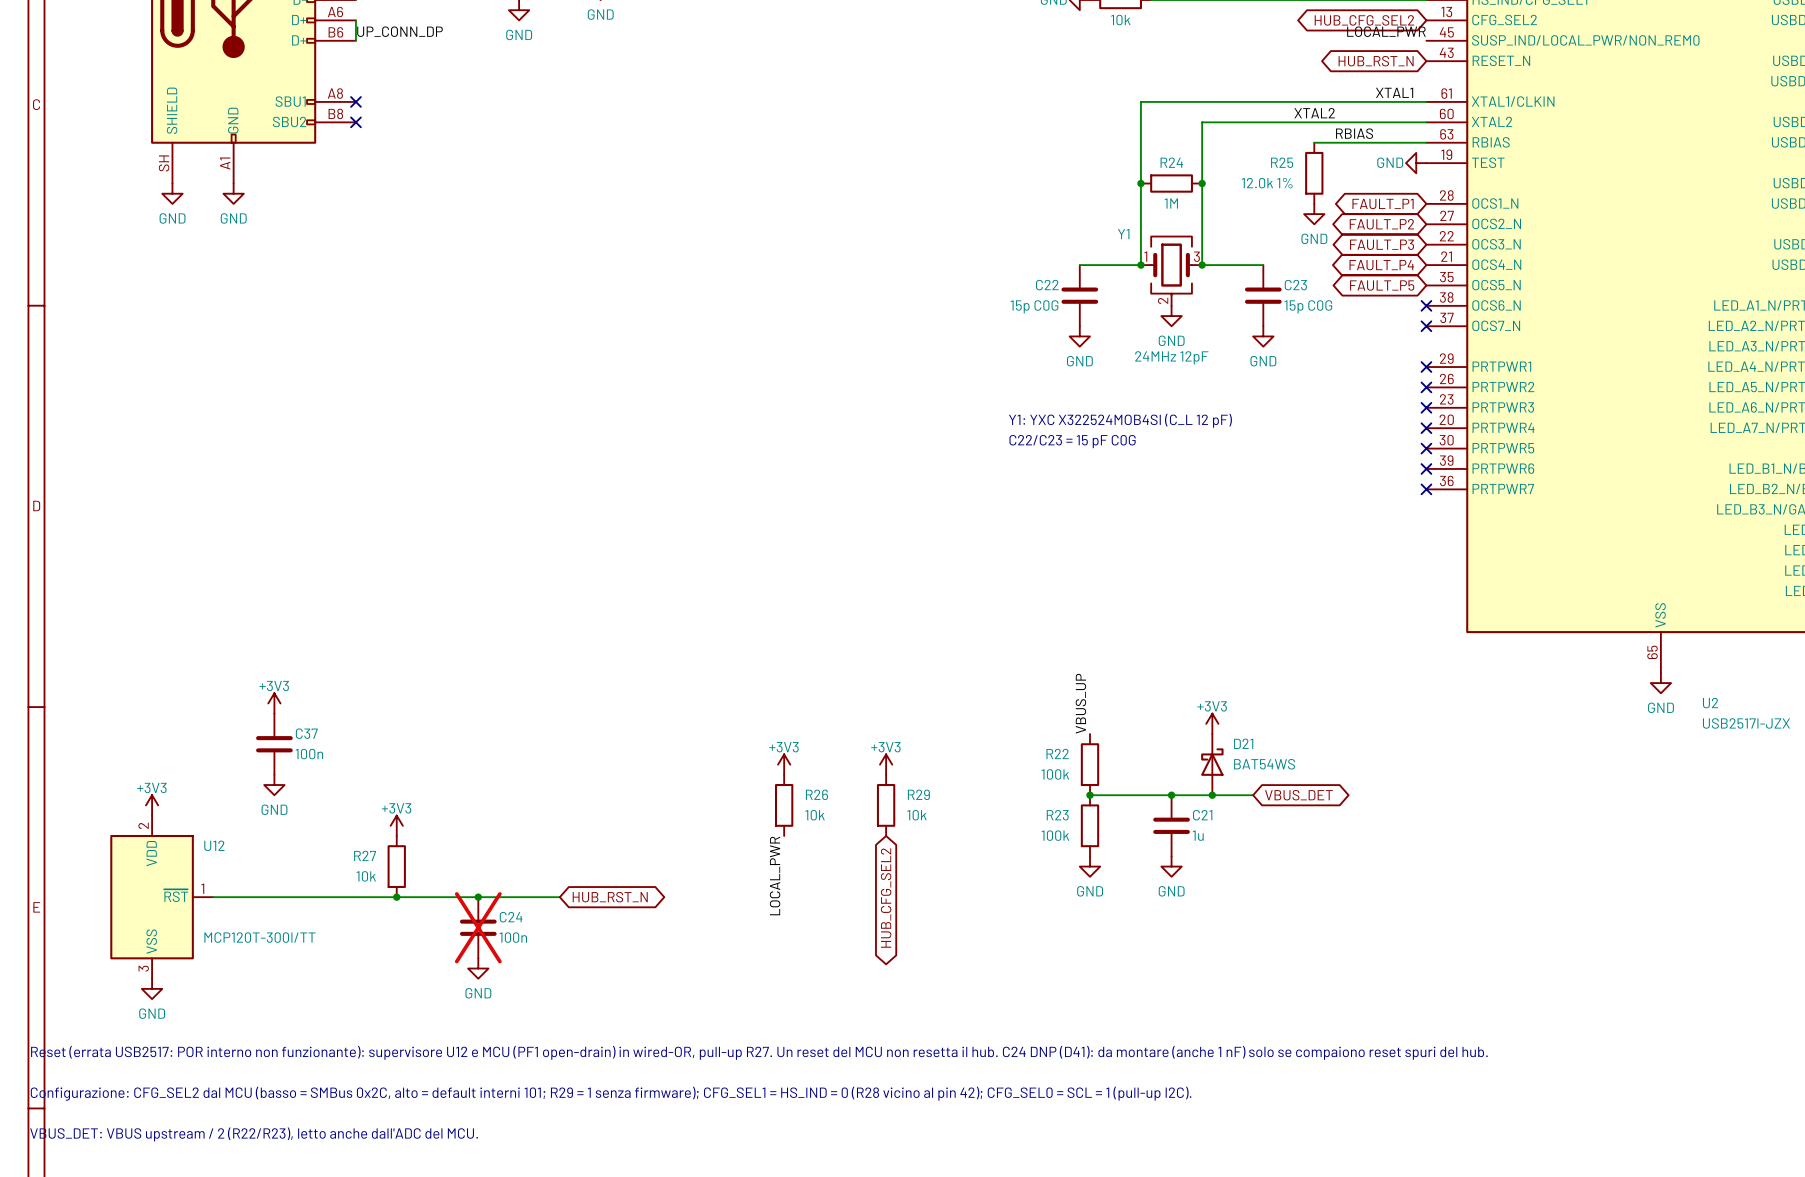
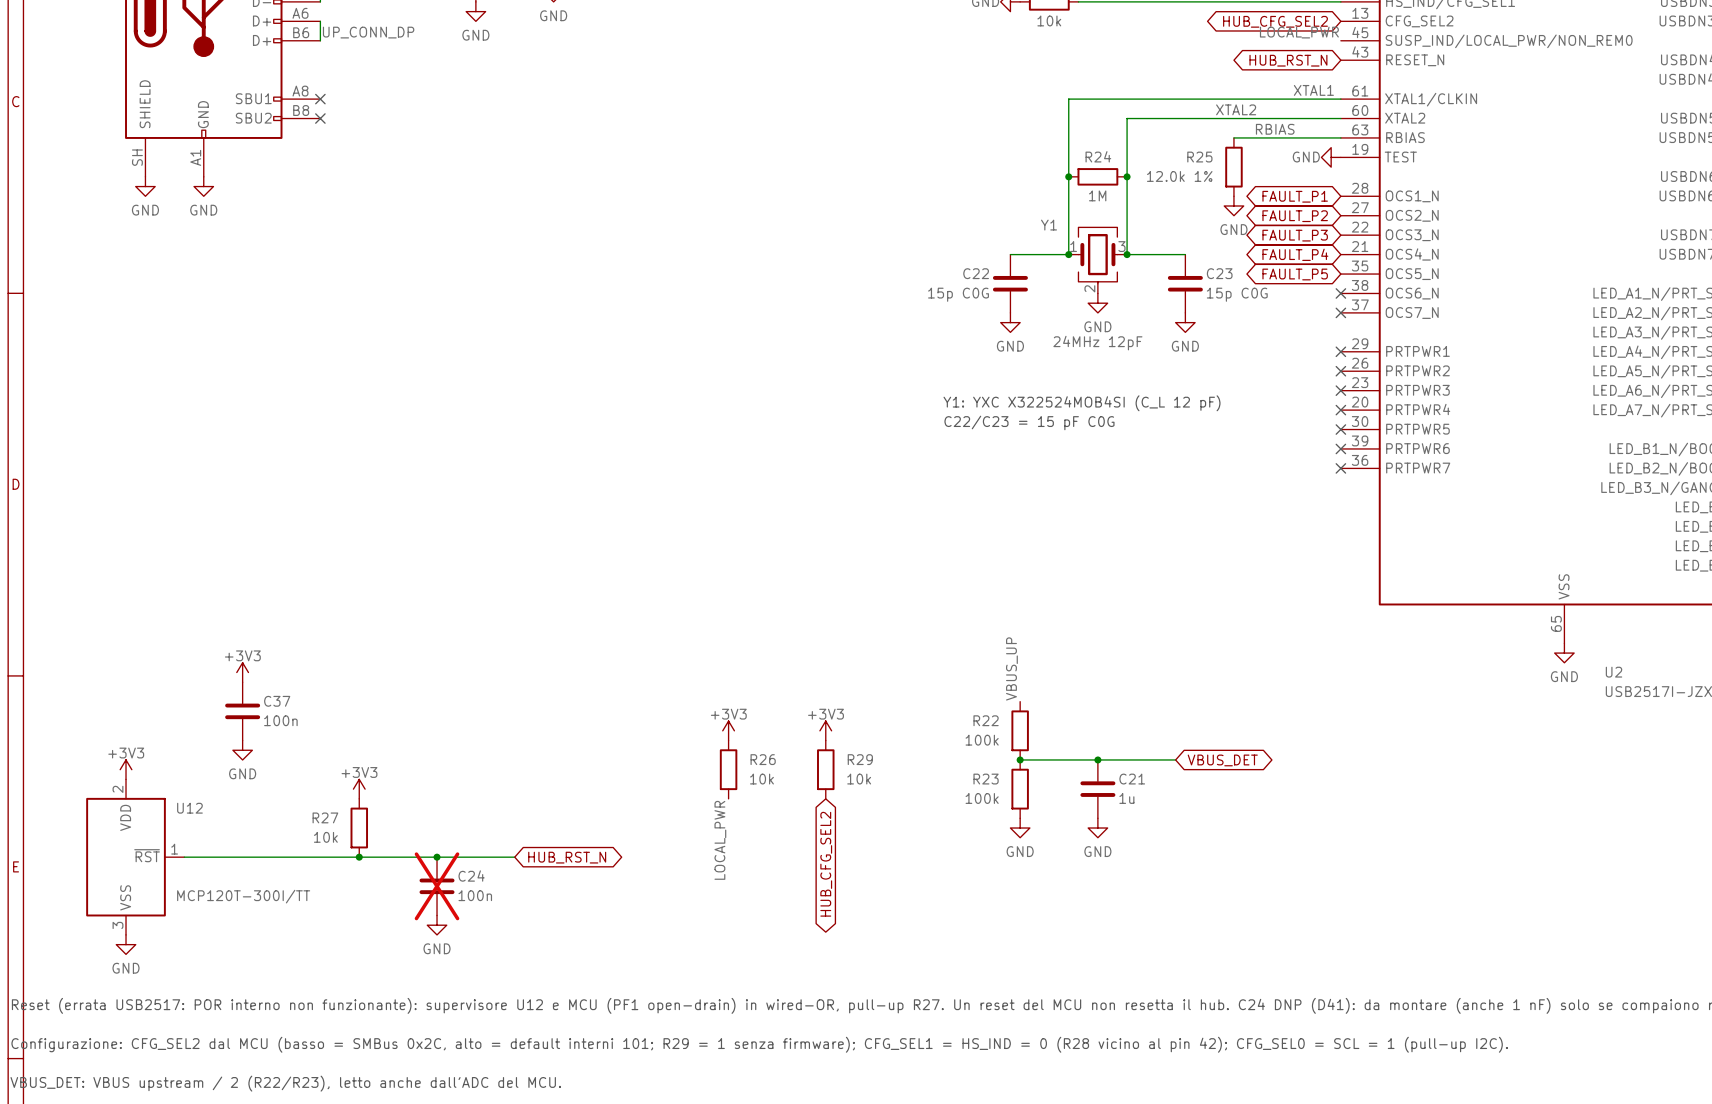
power symbol: +3V3 (1212, 723) -> none
D21: BAT54WS (1212, 764) -> none
junction: (1212, 795) -> none

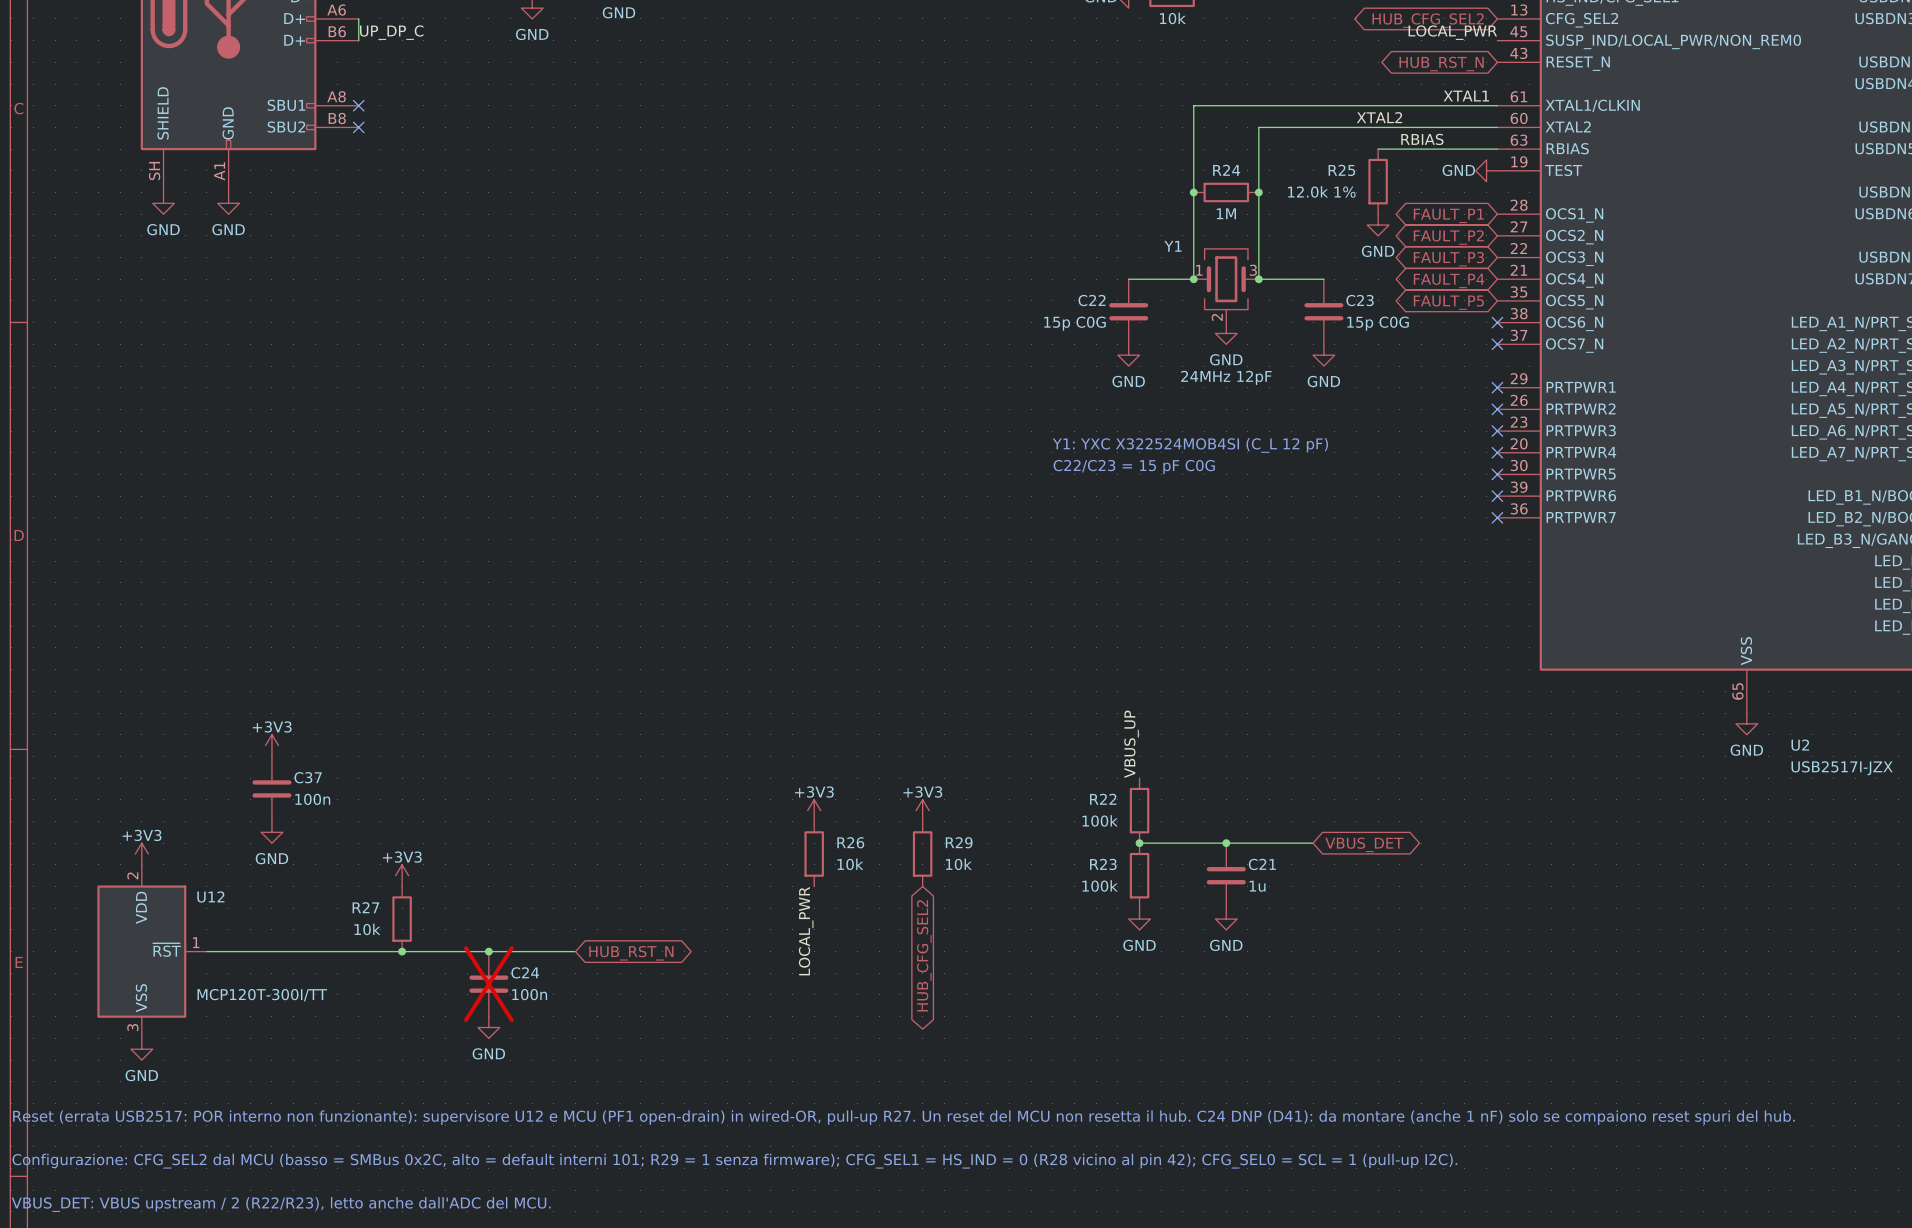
label: UP_CONN_DP (368, 32) -> UP_DP_C (391, 32)

